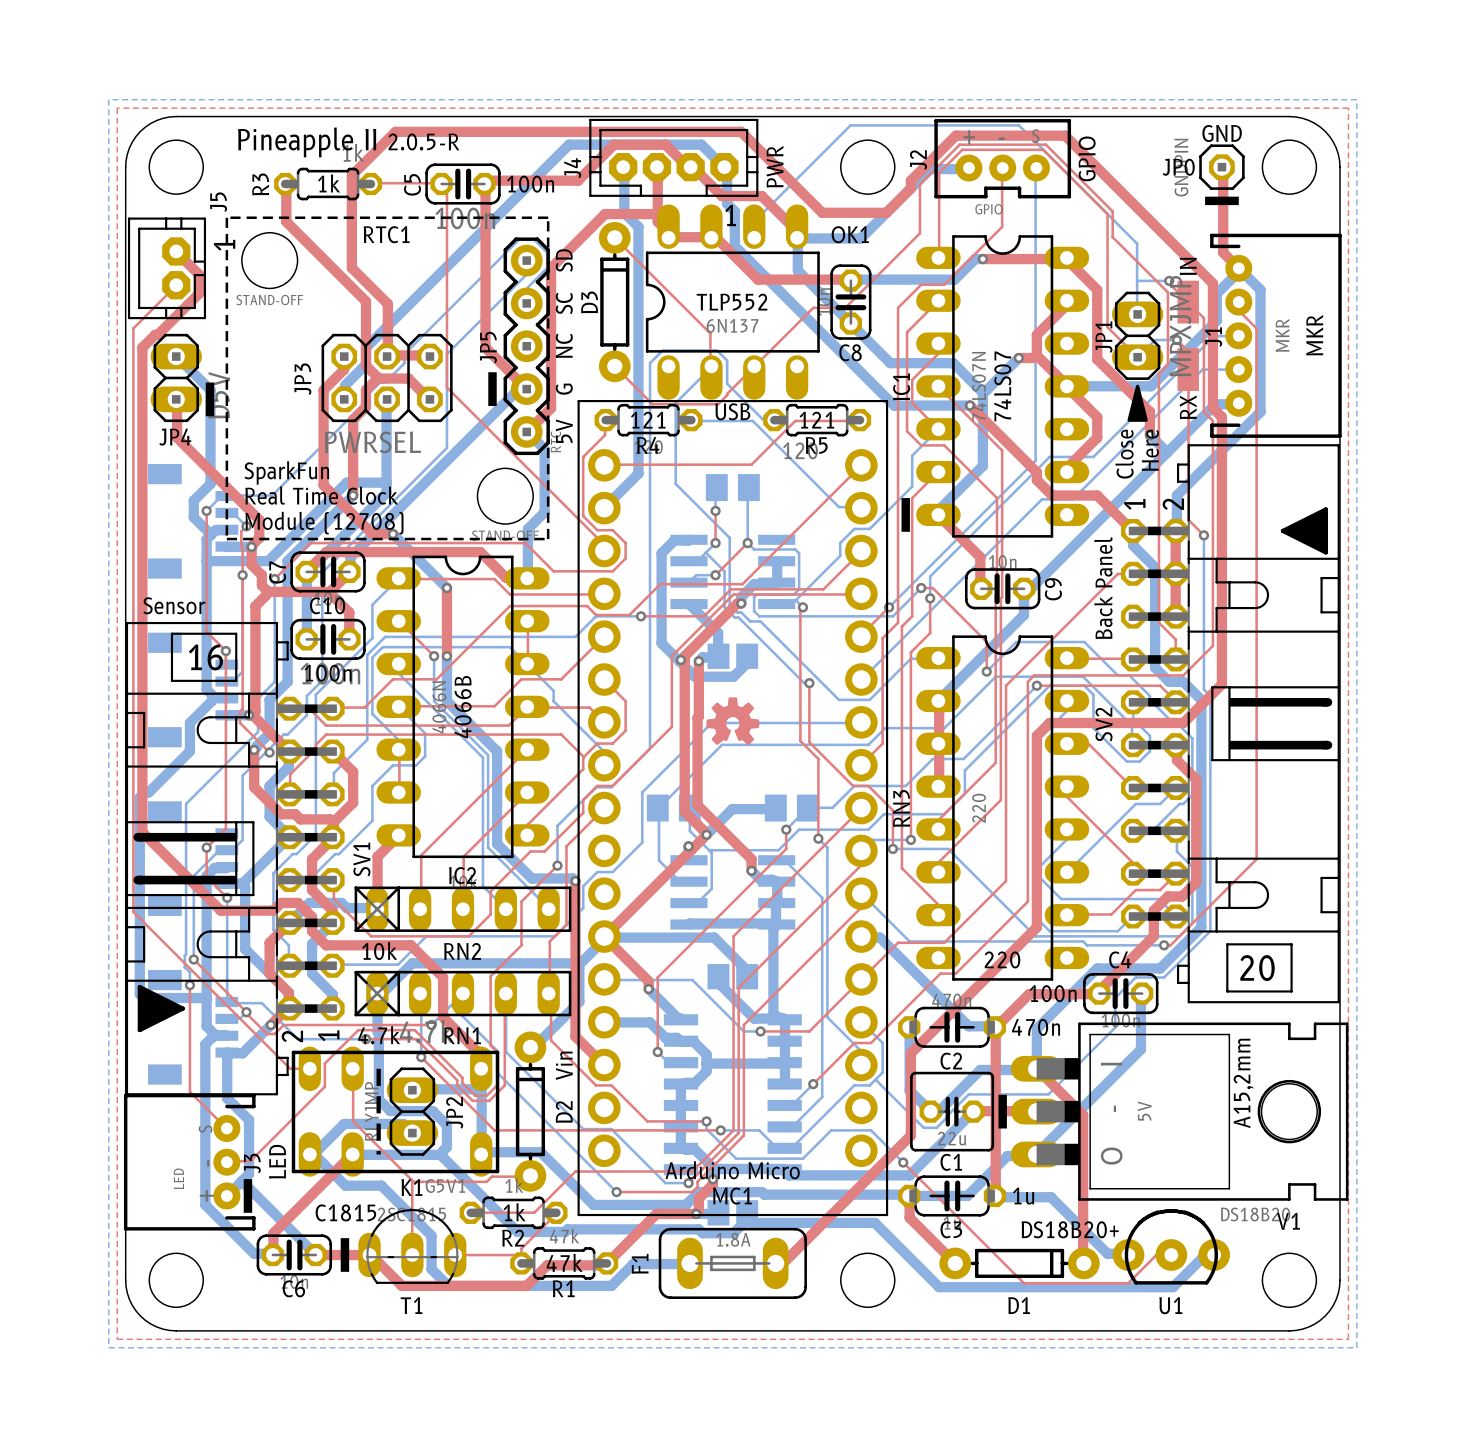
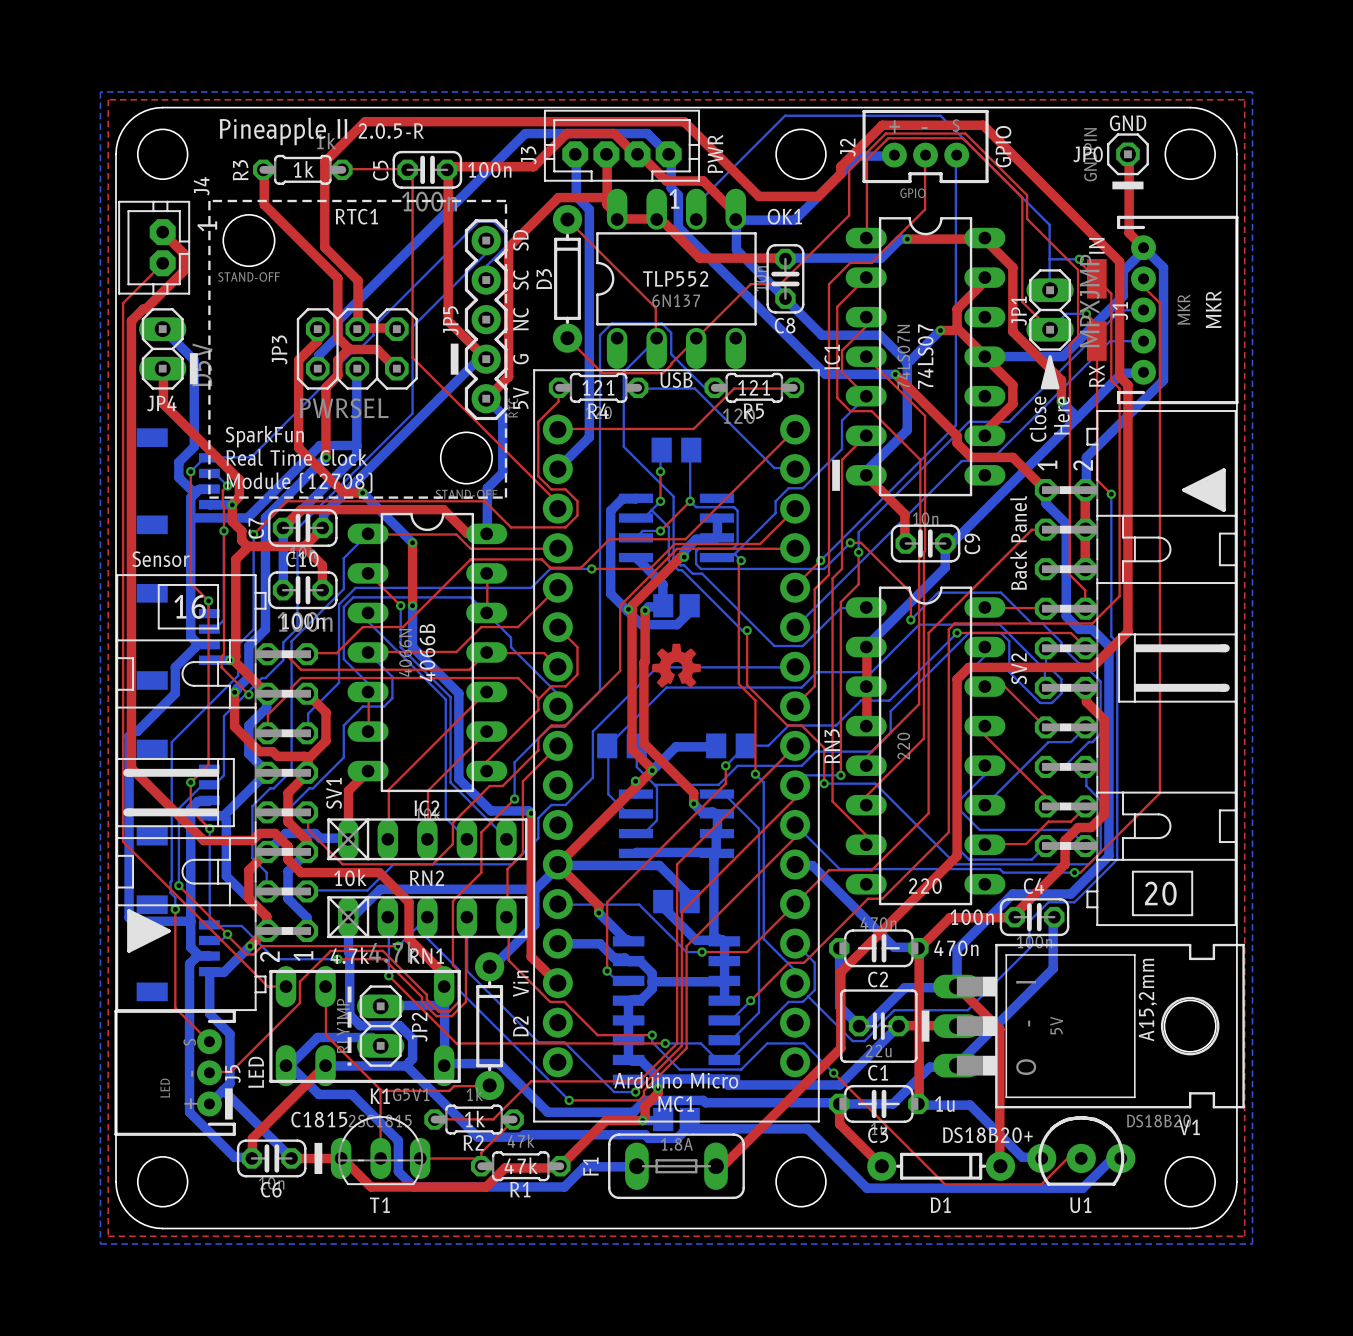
J4 name: J4 (572, 168) -> J3 (528, 155)
J5 name: J5 (218, 202) -> J4 (201, 186)
J3 name: J3 (252, 1163) -> J5 (232, 1073)

